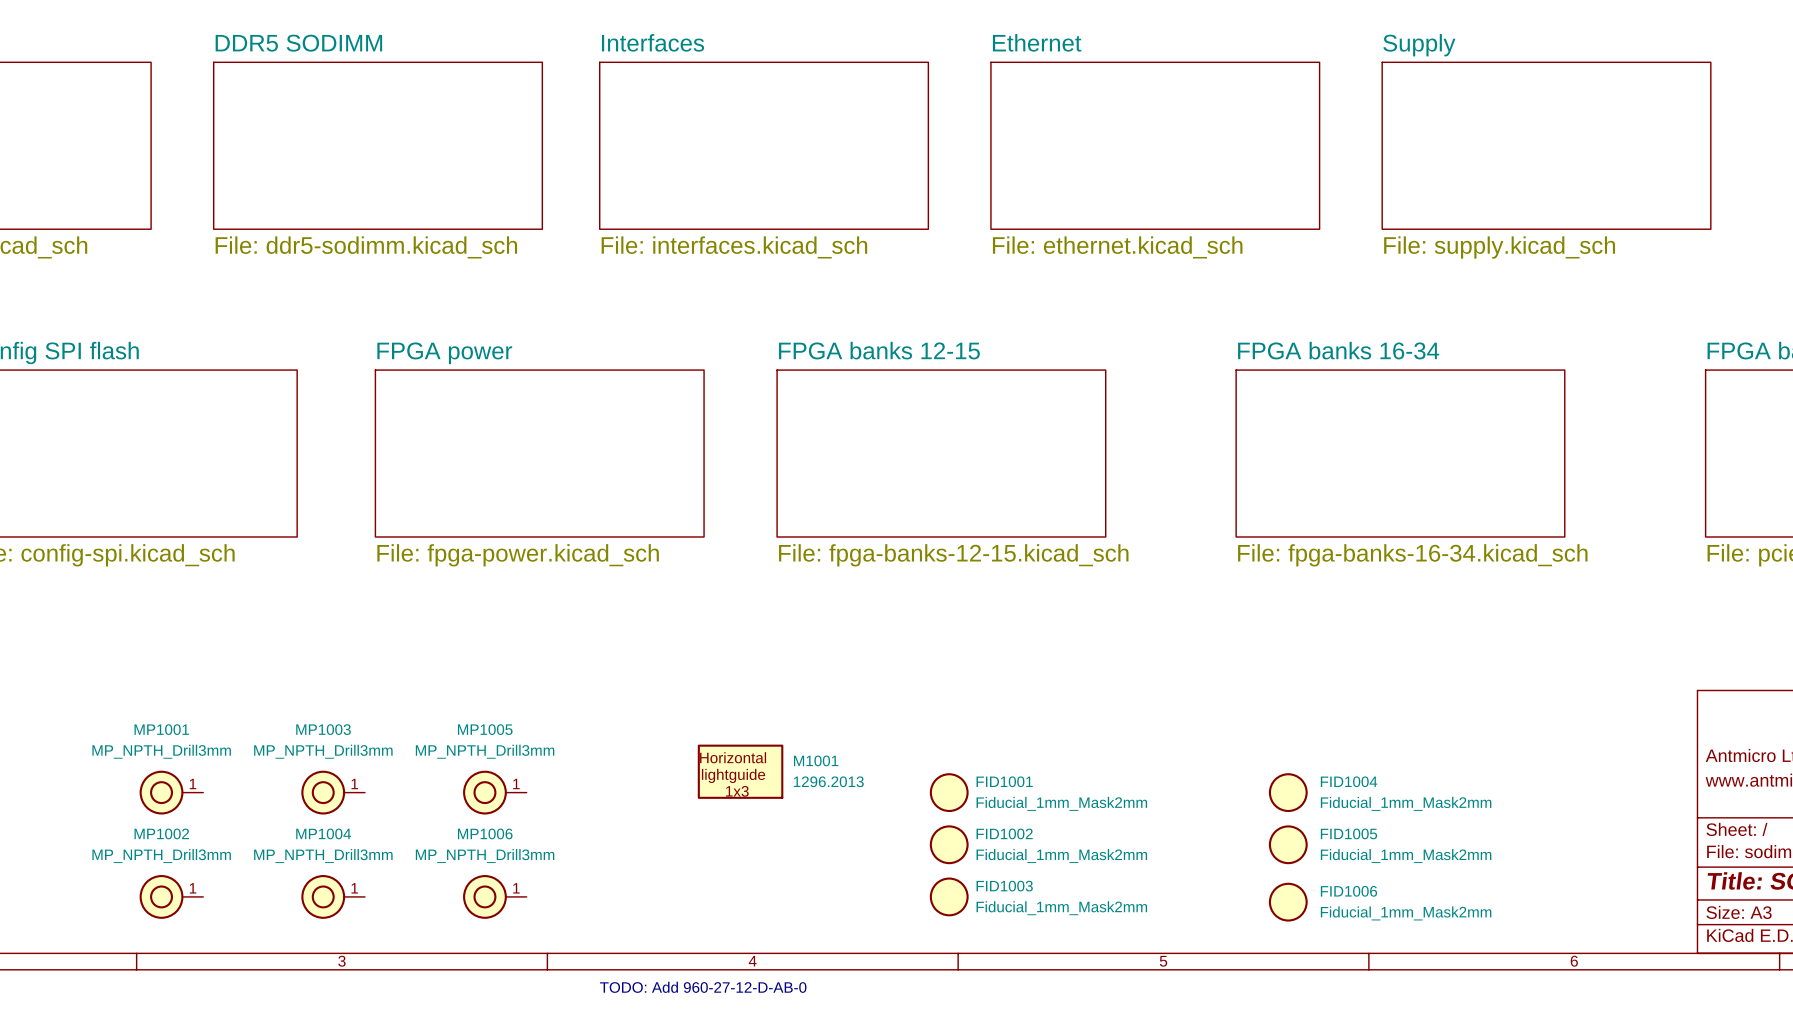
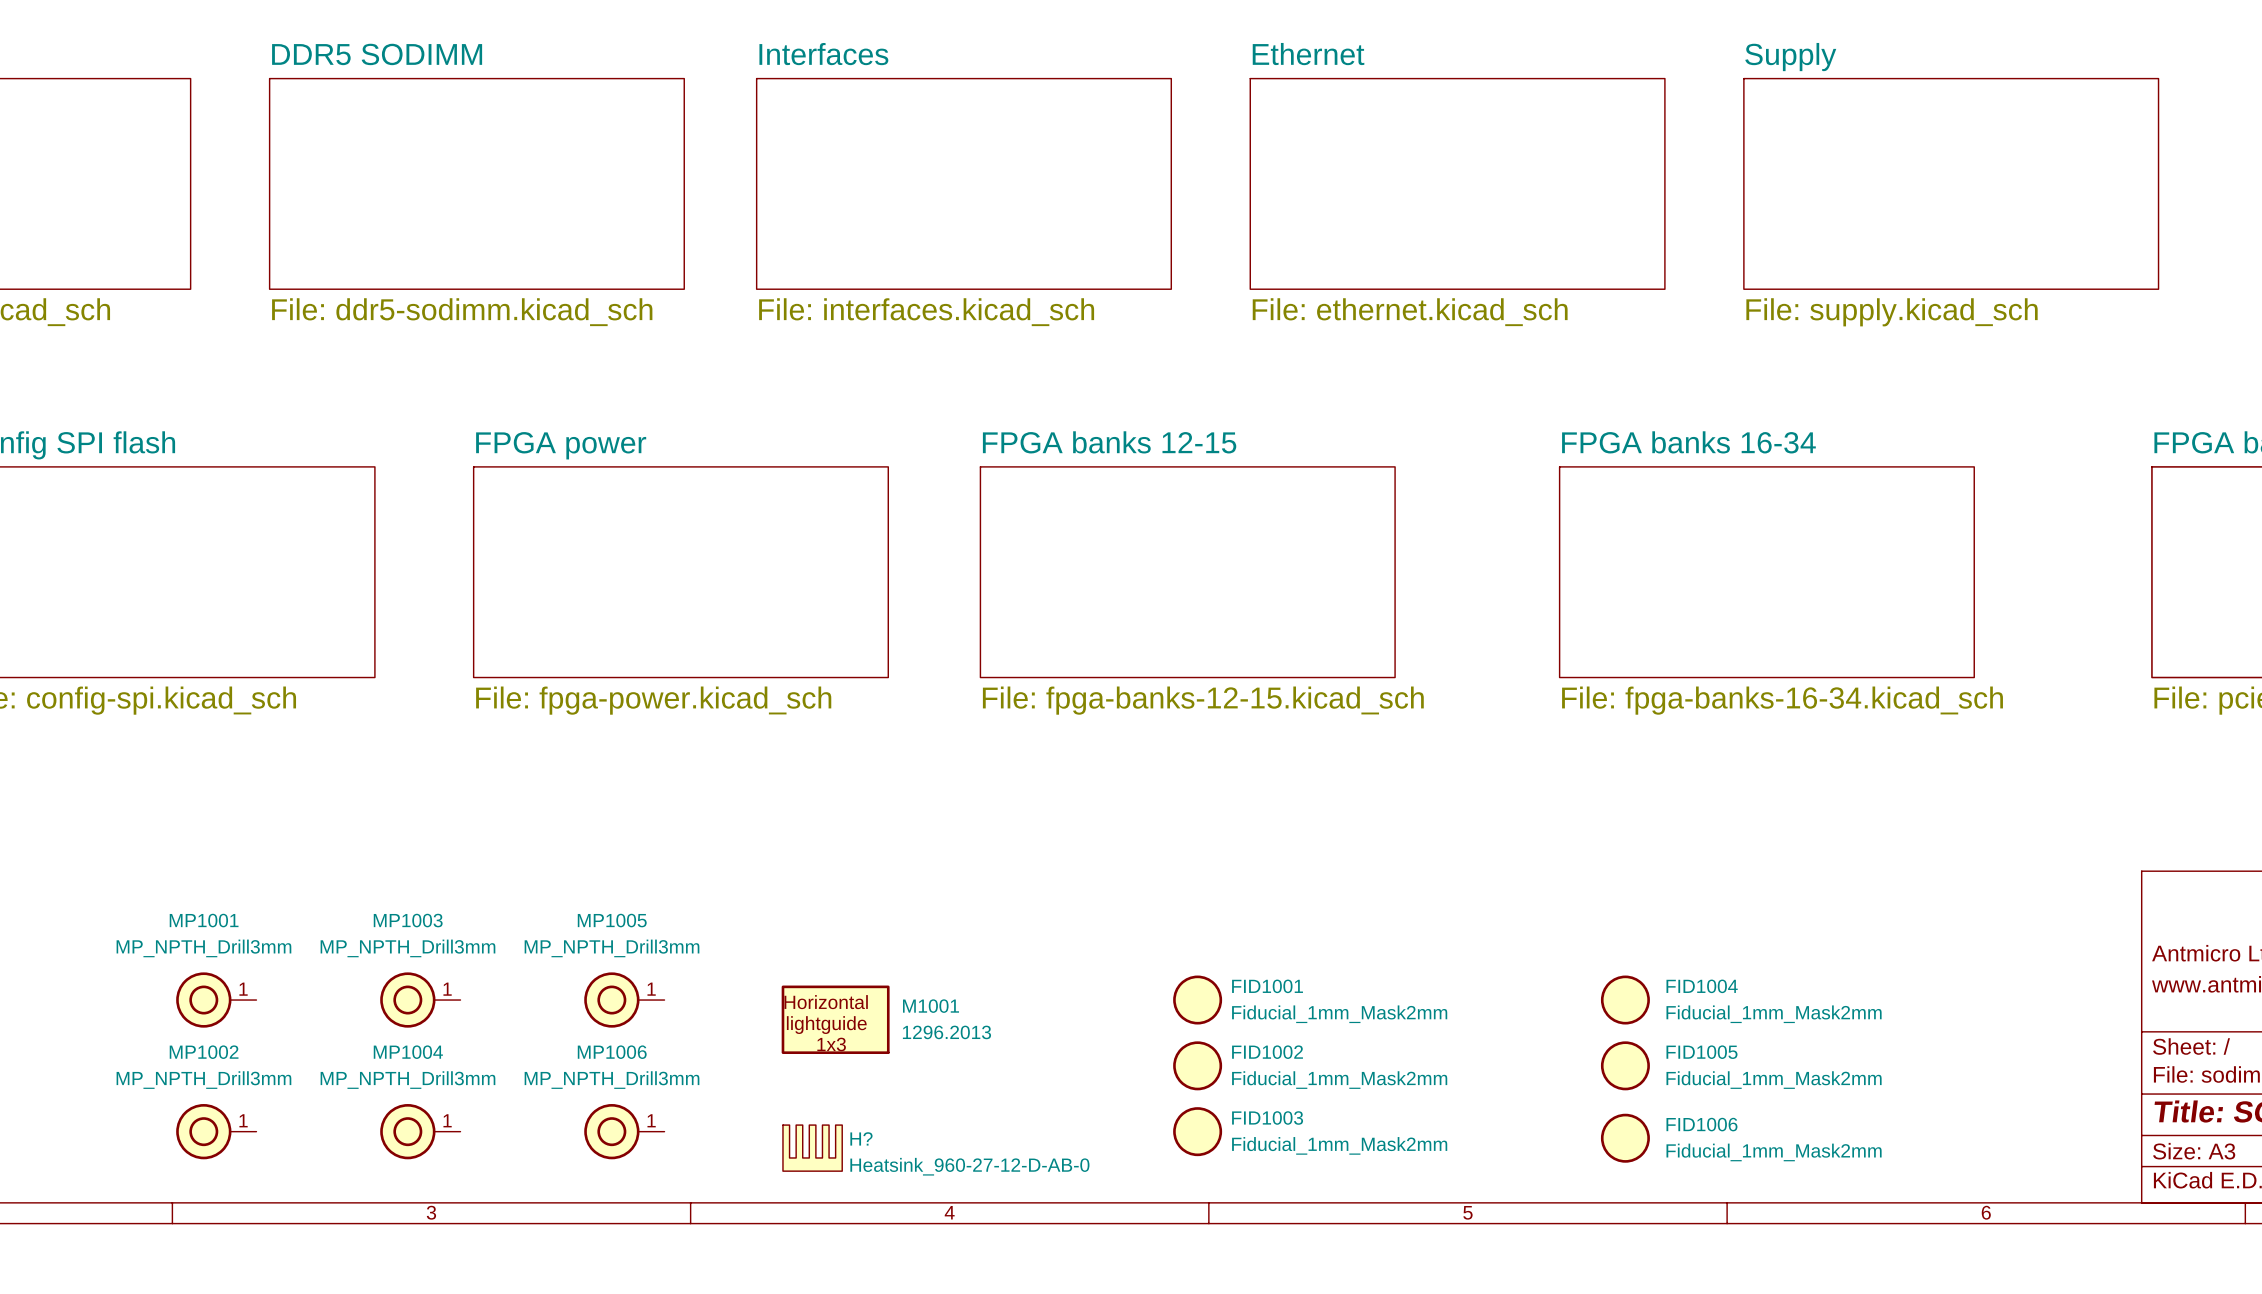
M1001 position: (740, 771) -> (835, 1019)
H?: none -> Heatsink_960-27-12-D-AB-0 (812, 1148)
text: TODO: Add 960-27-12-D-AB-0 (703, 987) -> none

